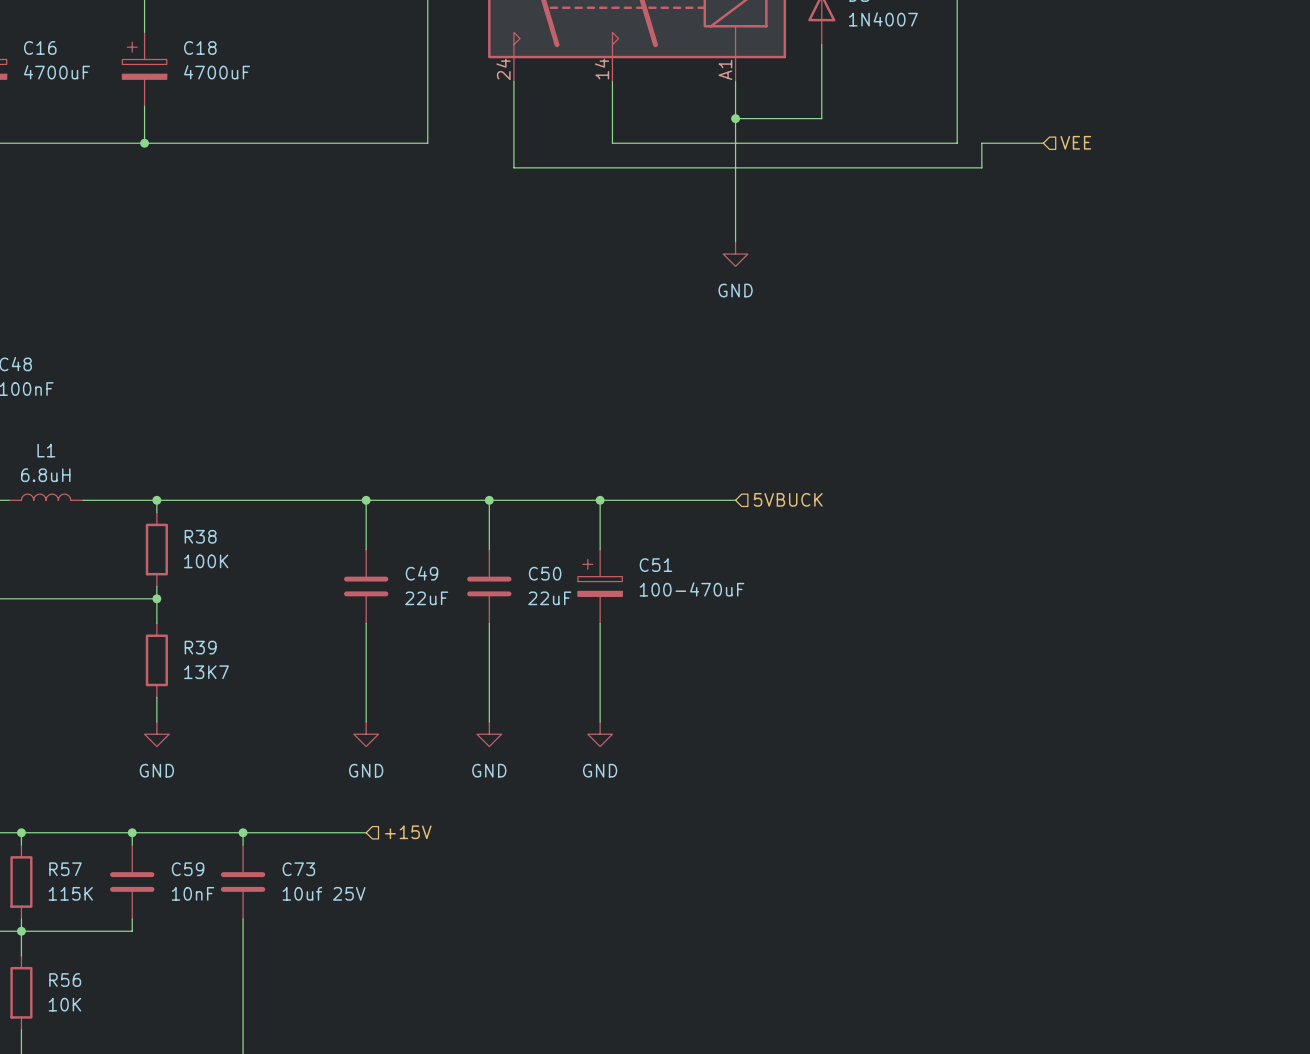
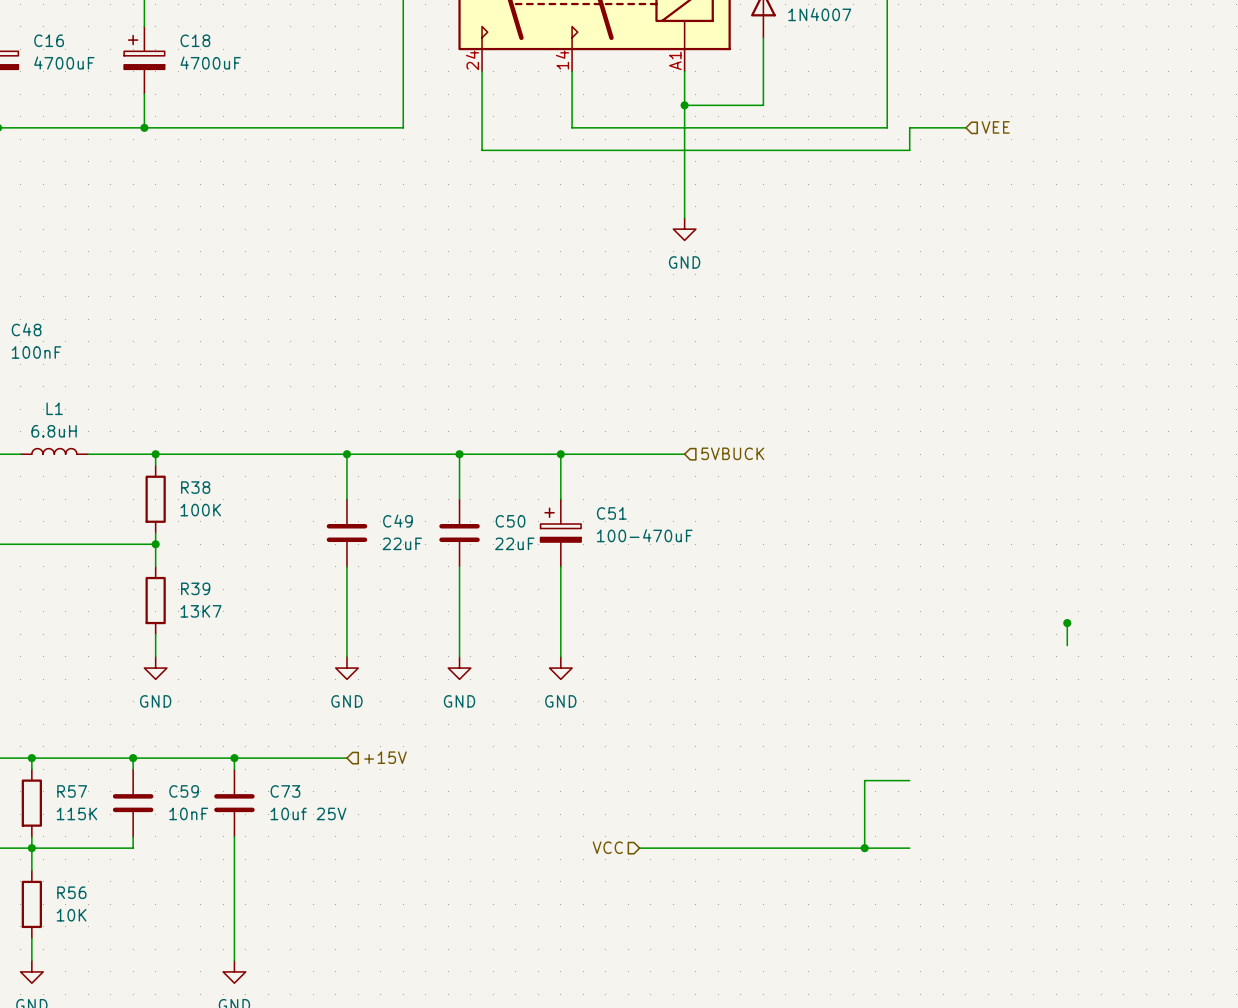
wire: none -> (1067, 623) (1067, 645)
junction: none -> (1067, 623)
wire: none -> (909, 780) (864, 780) (864, 848)
hierarchical label: none -> VCC (607, 847)
wire: none -> (639, 848) (909, 848)
junction: none -> (864, 848)

